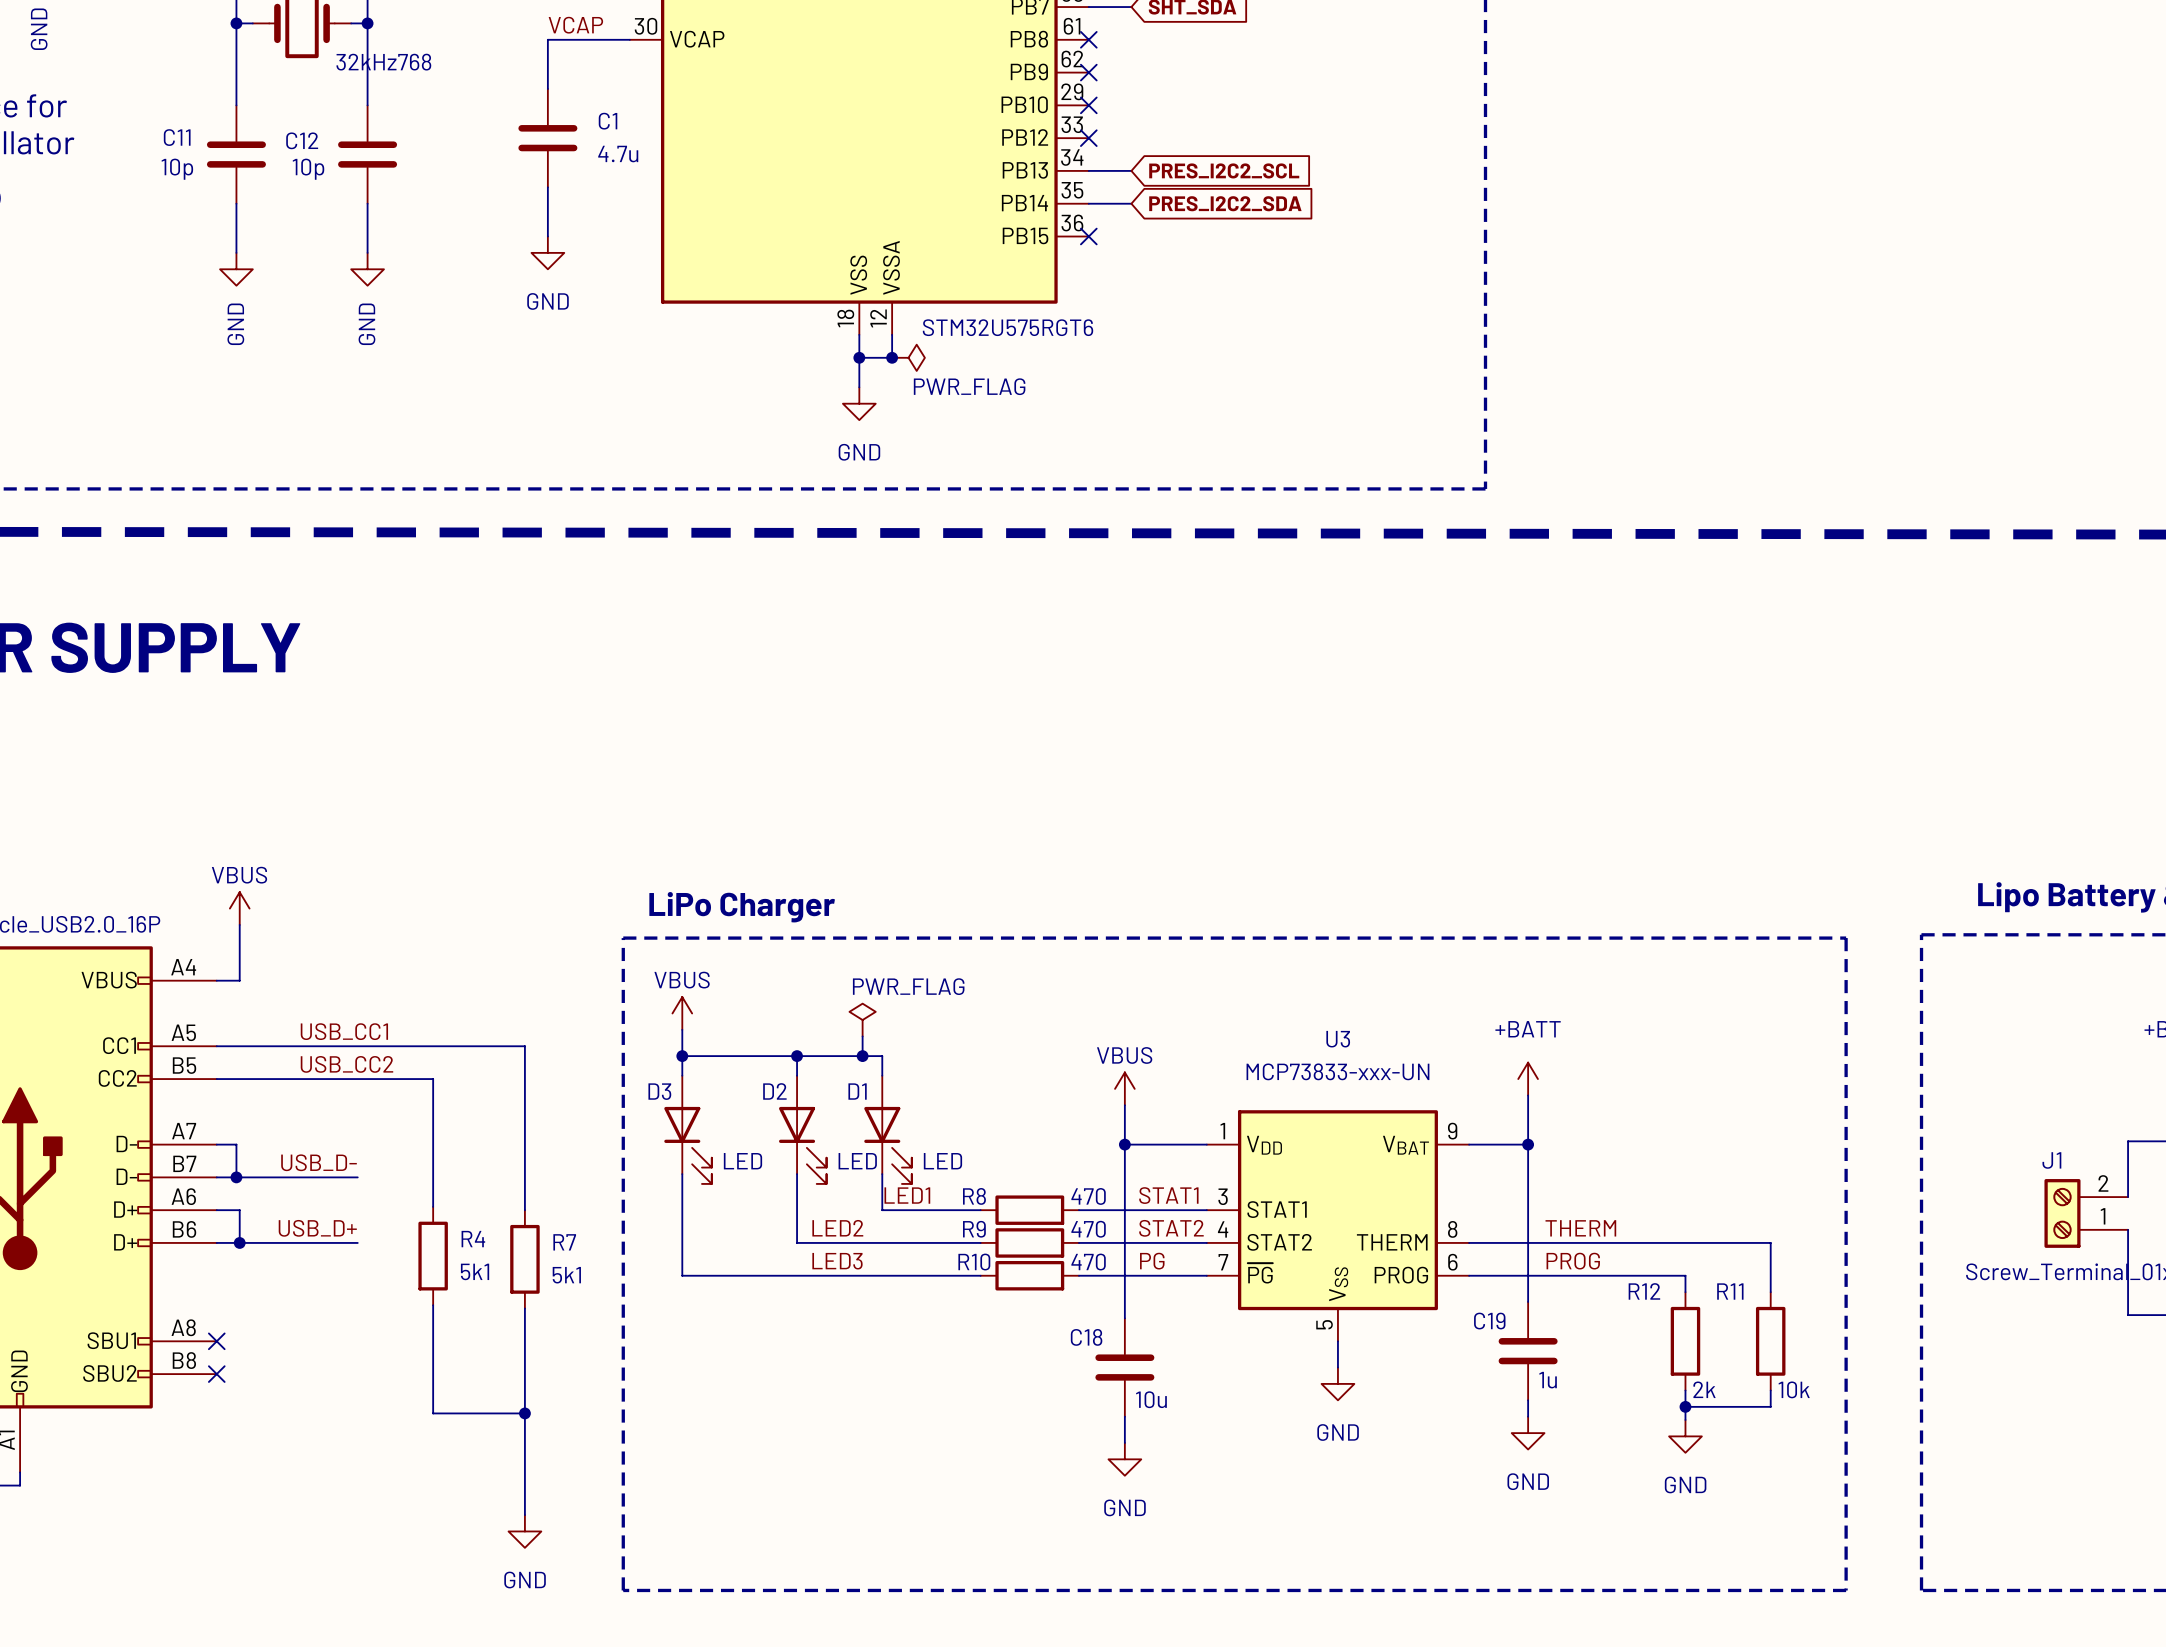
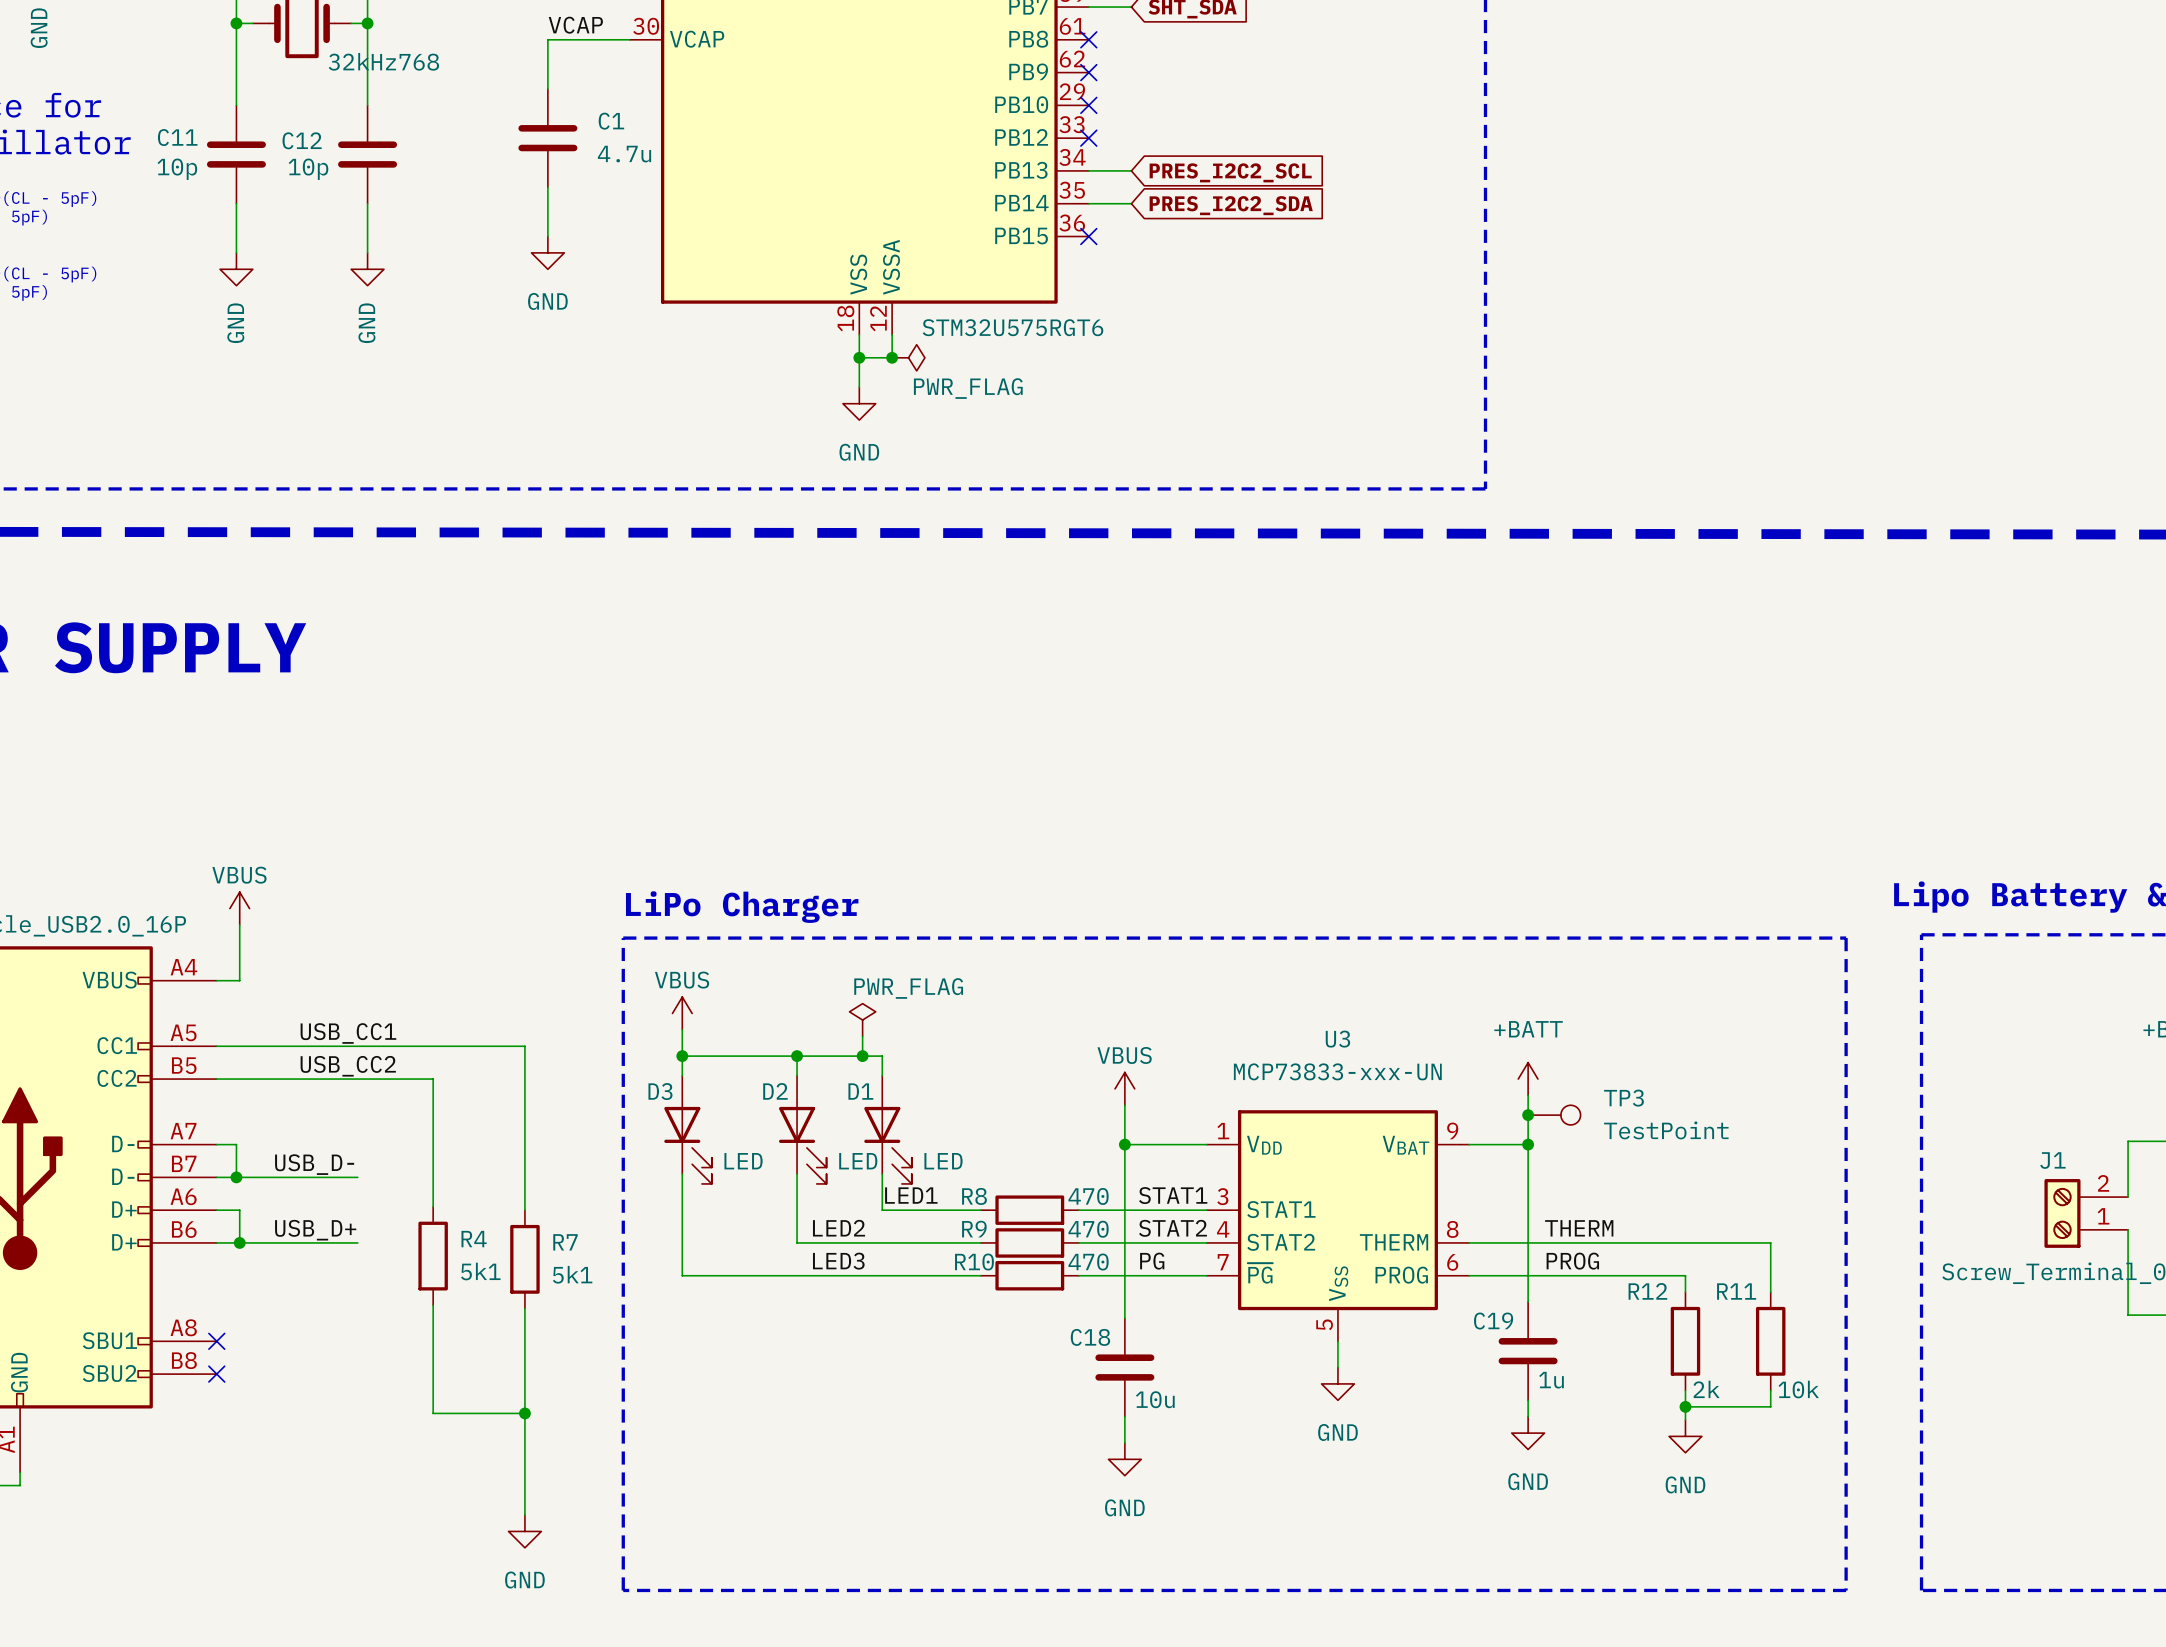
junction: none -> (1528, 1115)
TP3: none -> TestPoint (1554, 1115)

